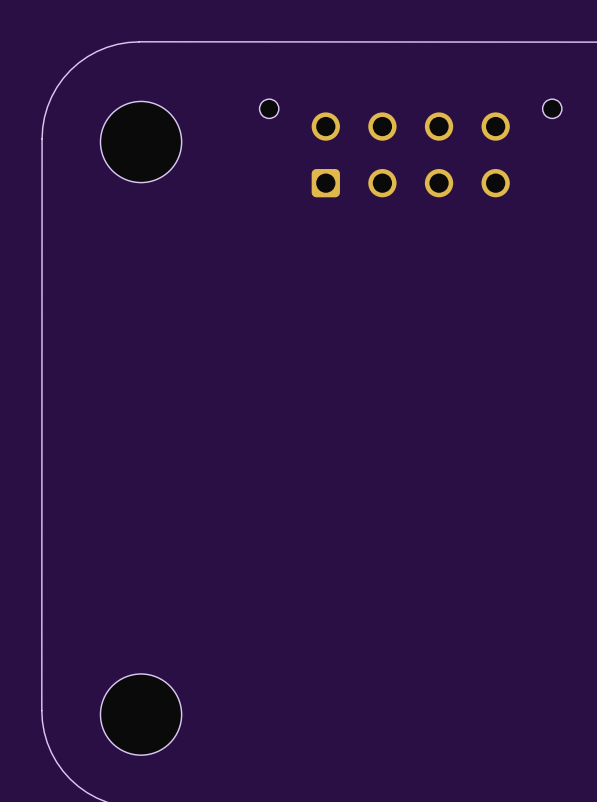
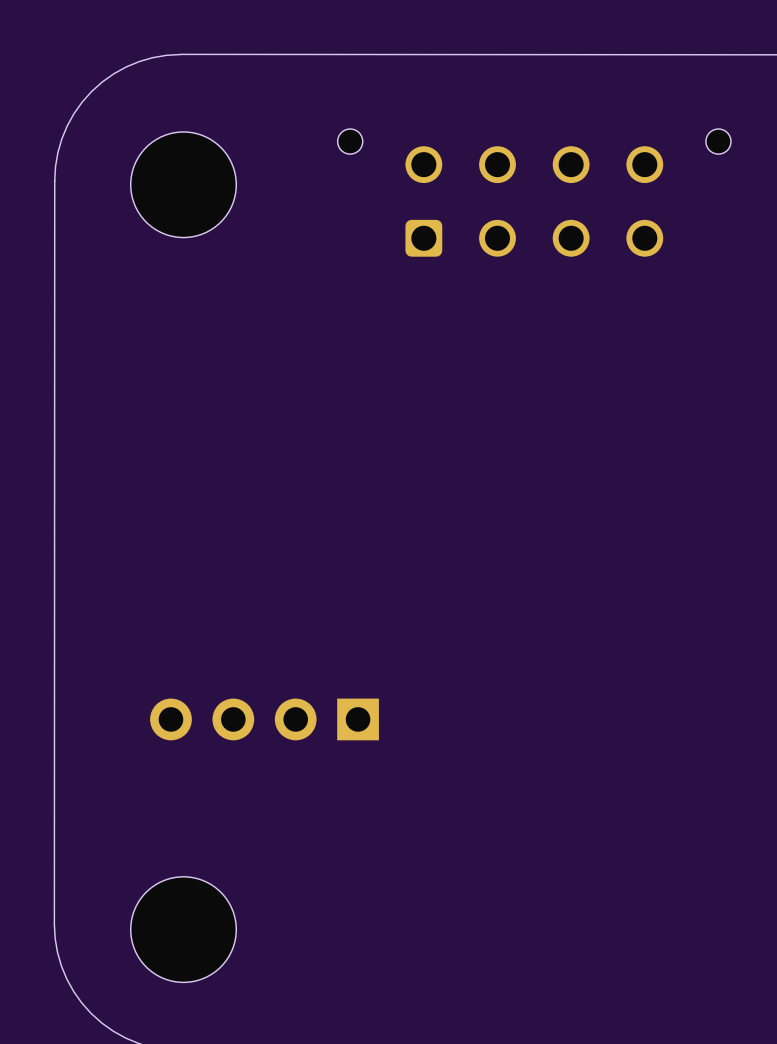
part: none -> (264, 719)

